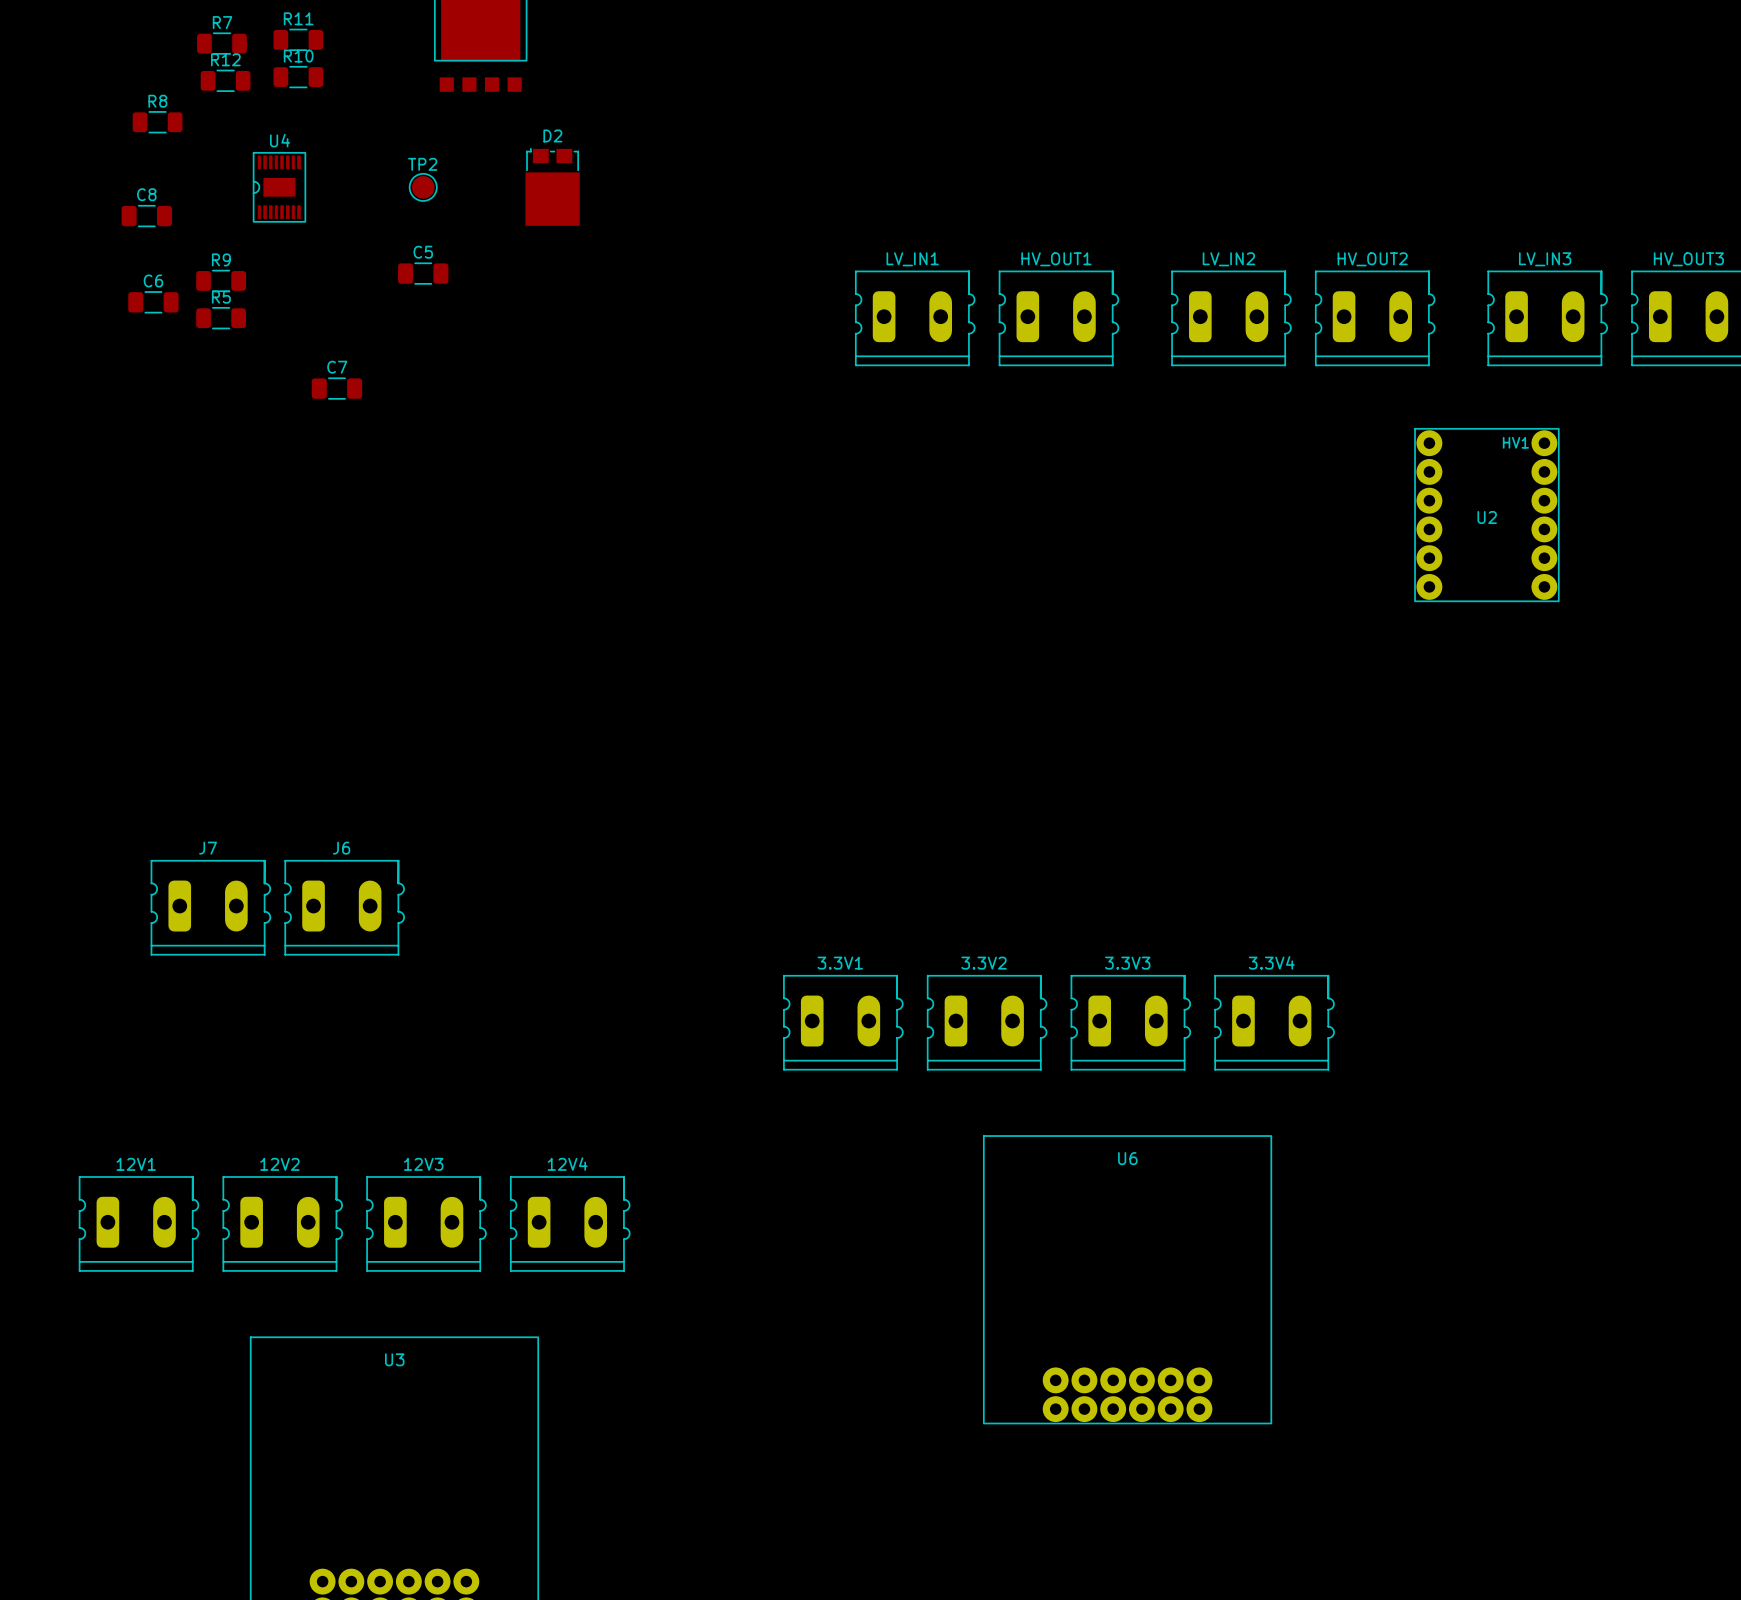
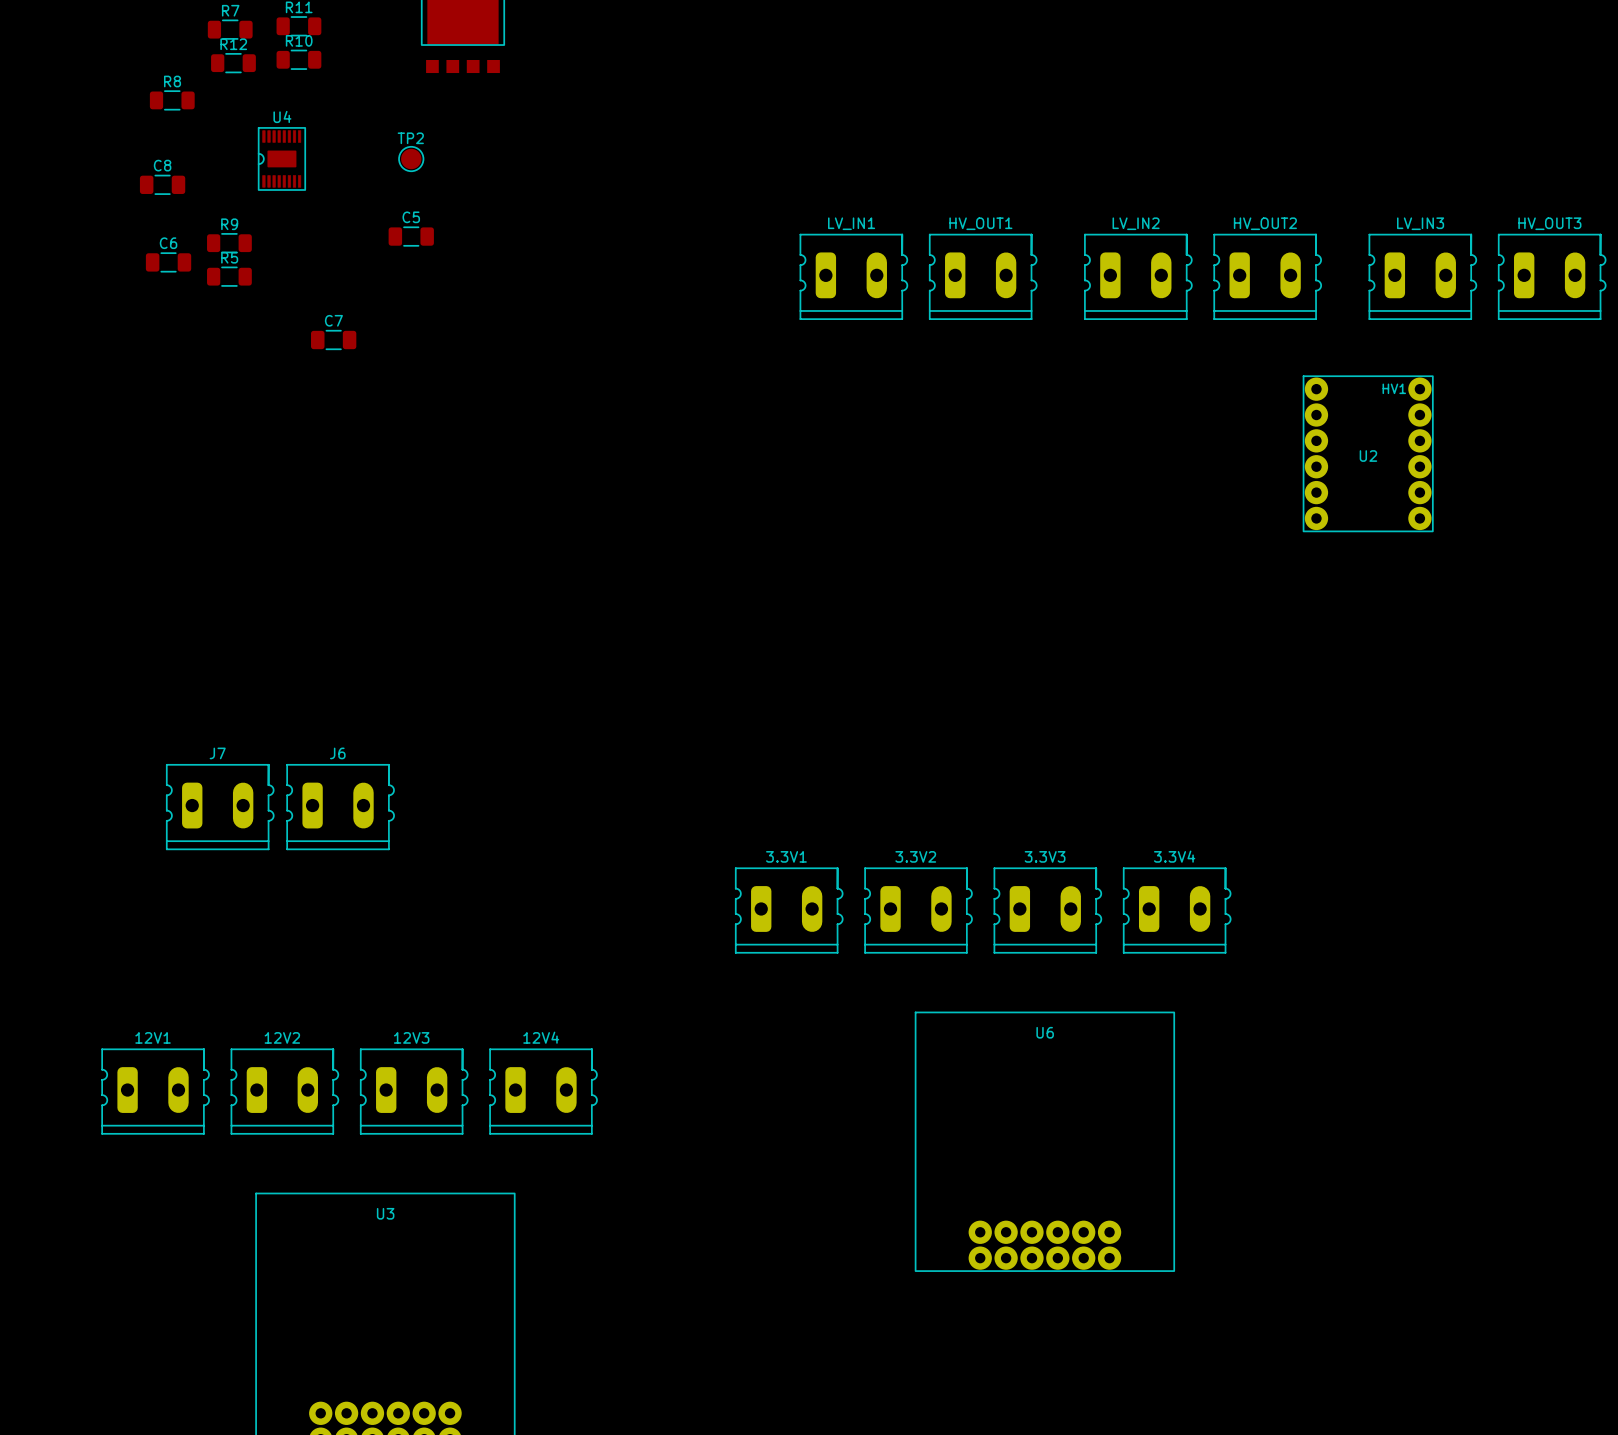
D2: (552, 186) -> none

